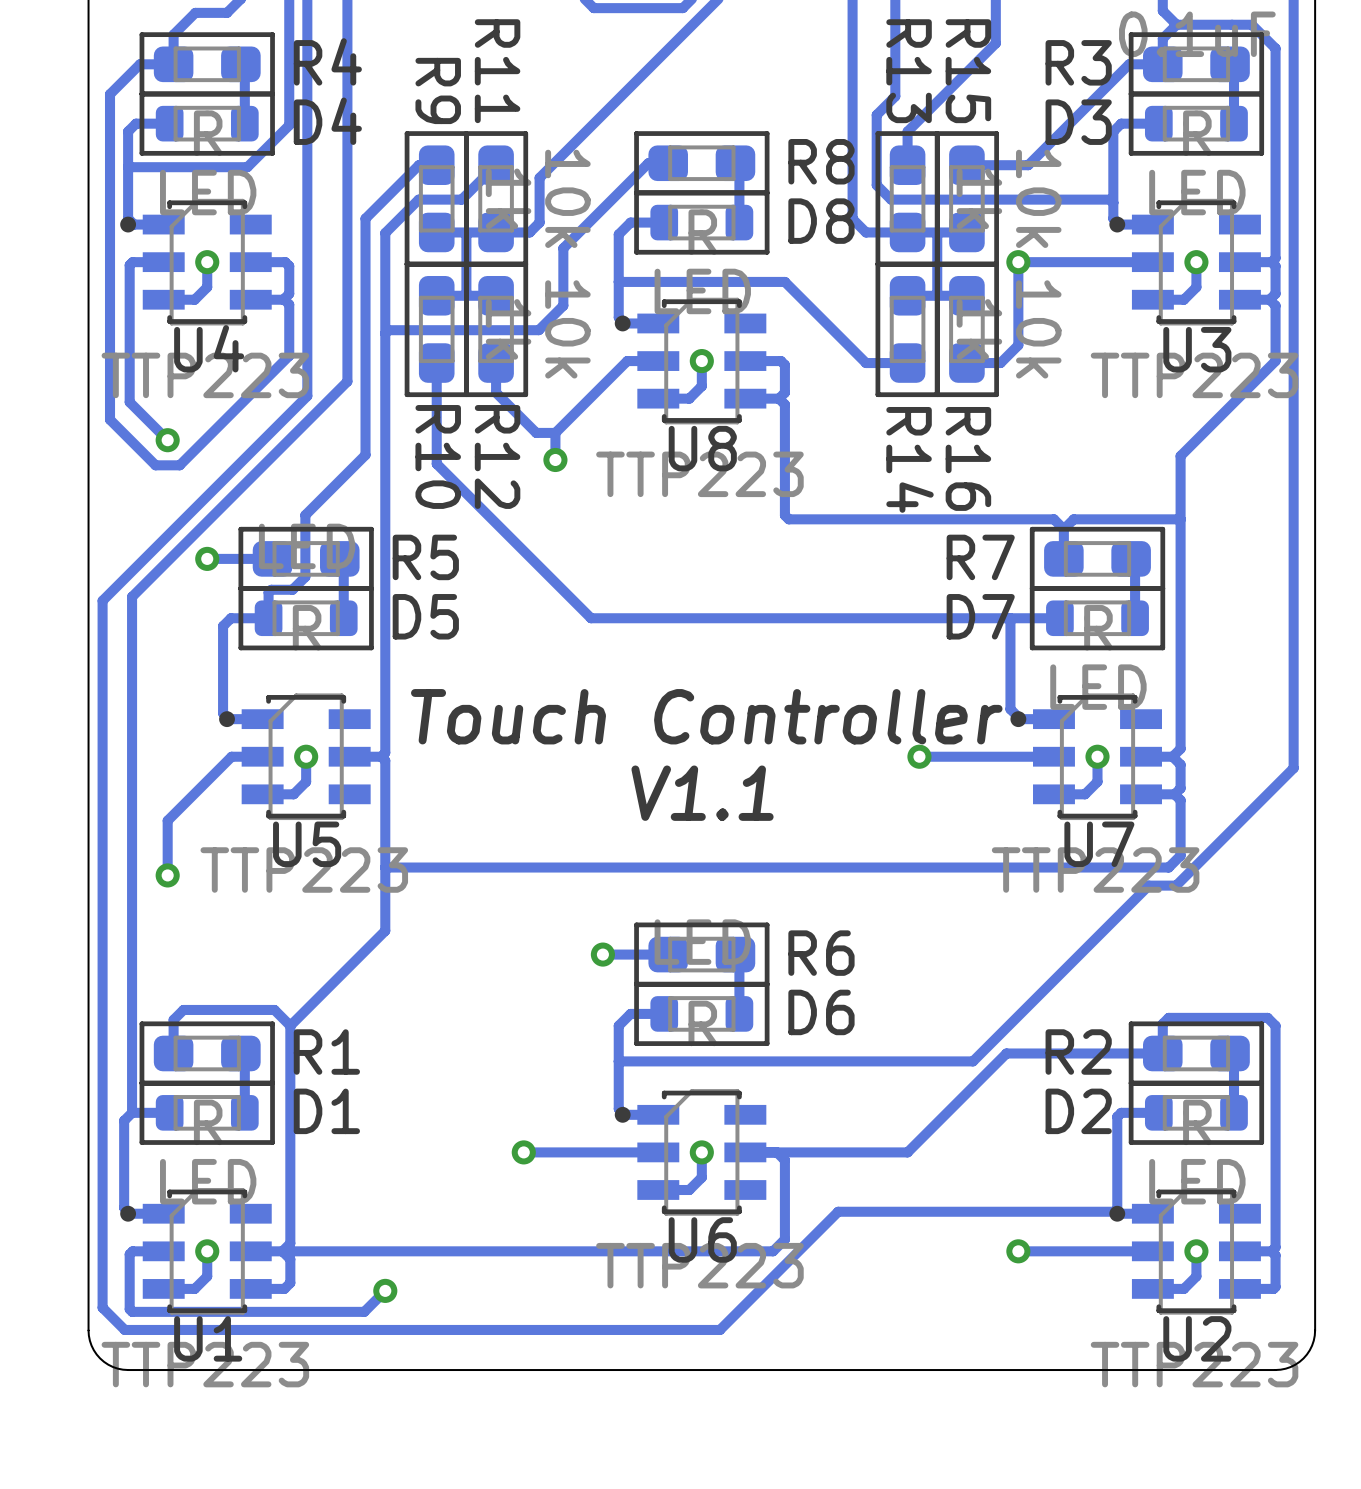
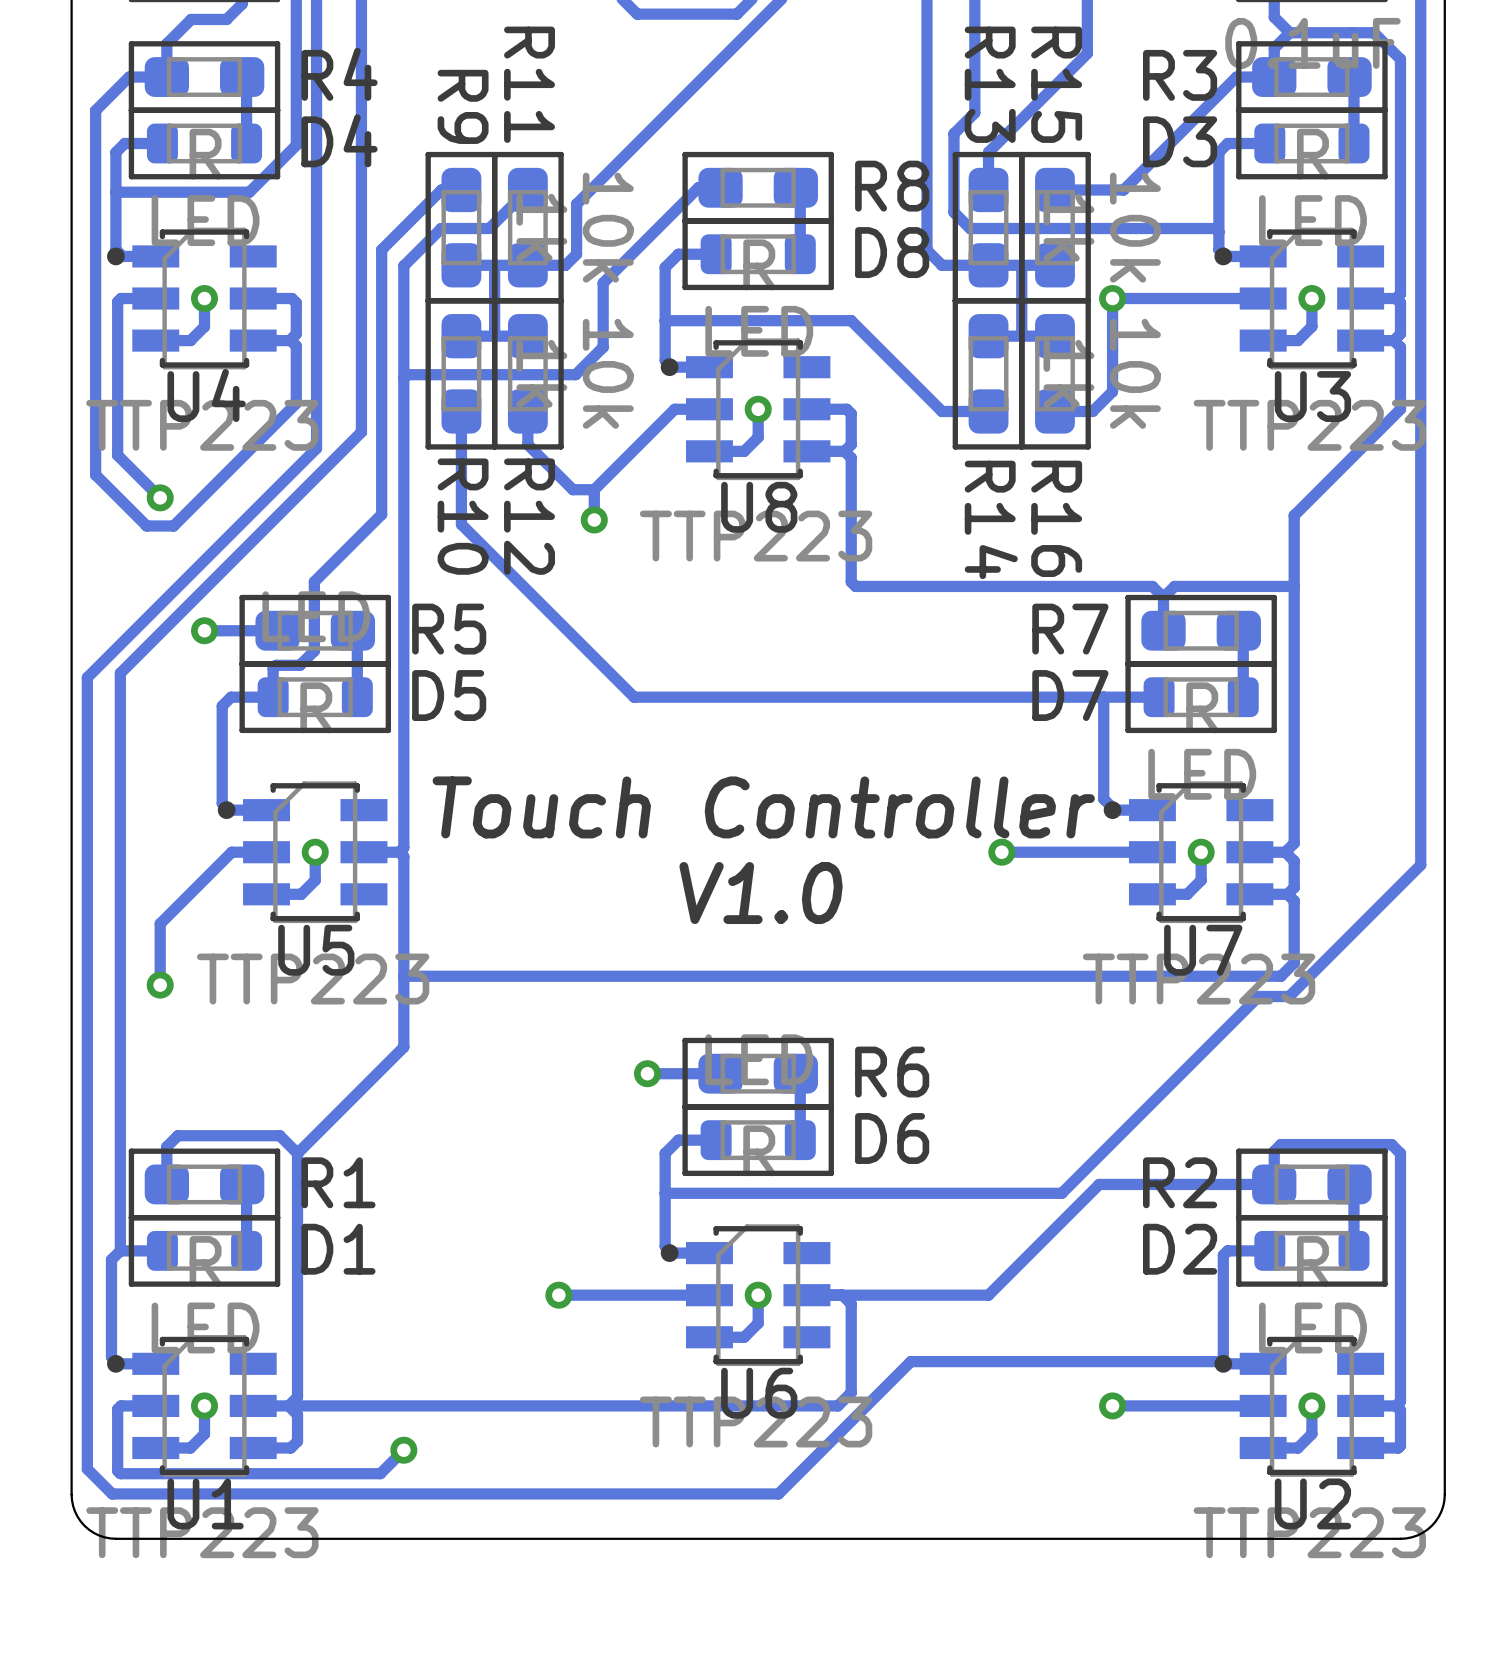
text: V1.1 (702, 793) -> V1.0 (761, 893)

